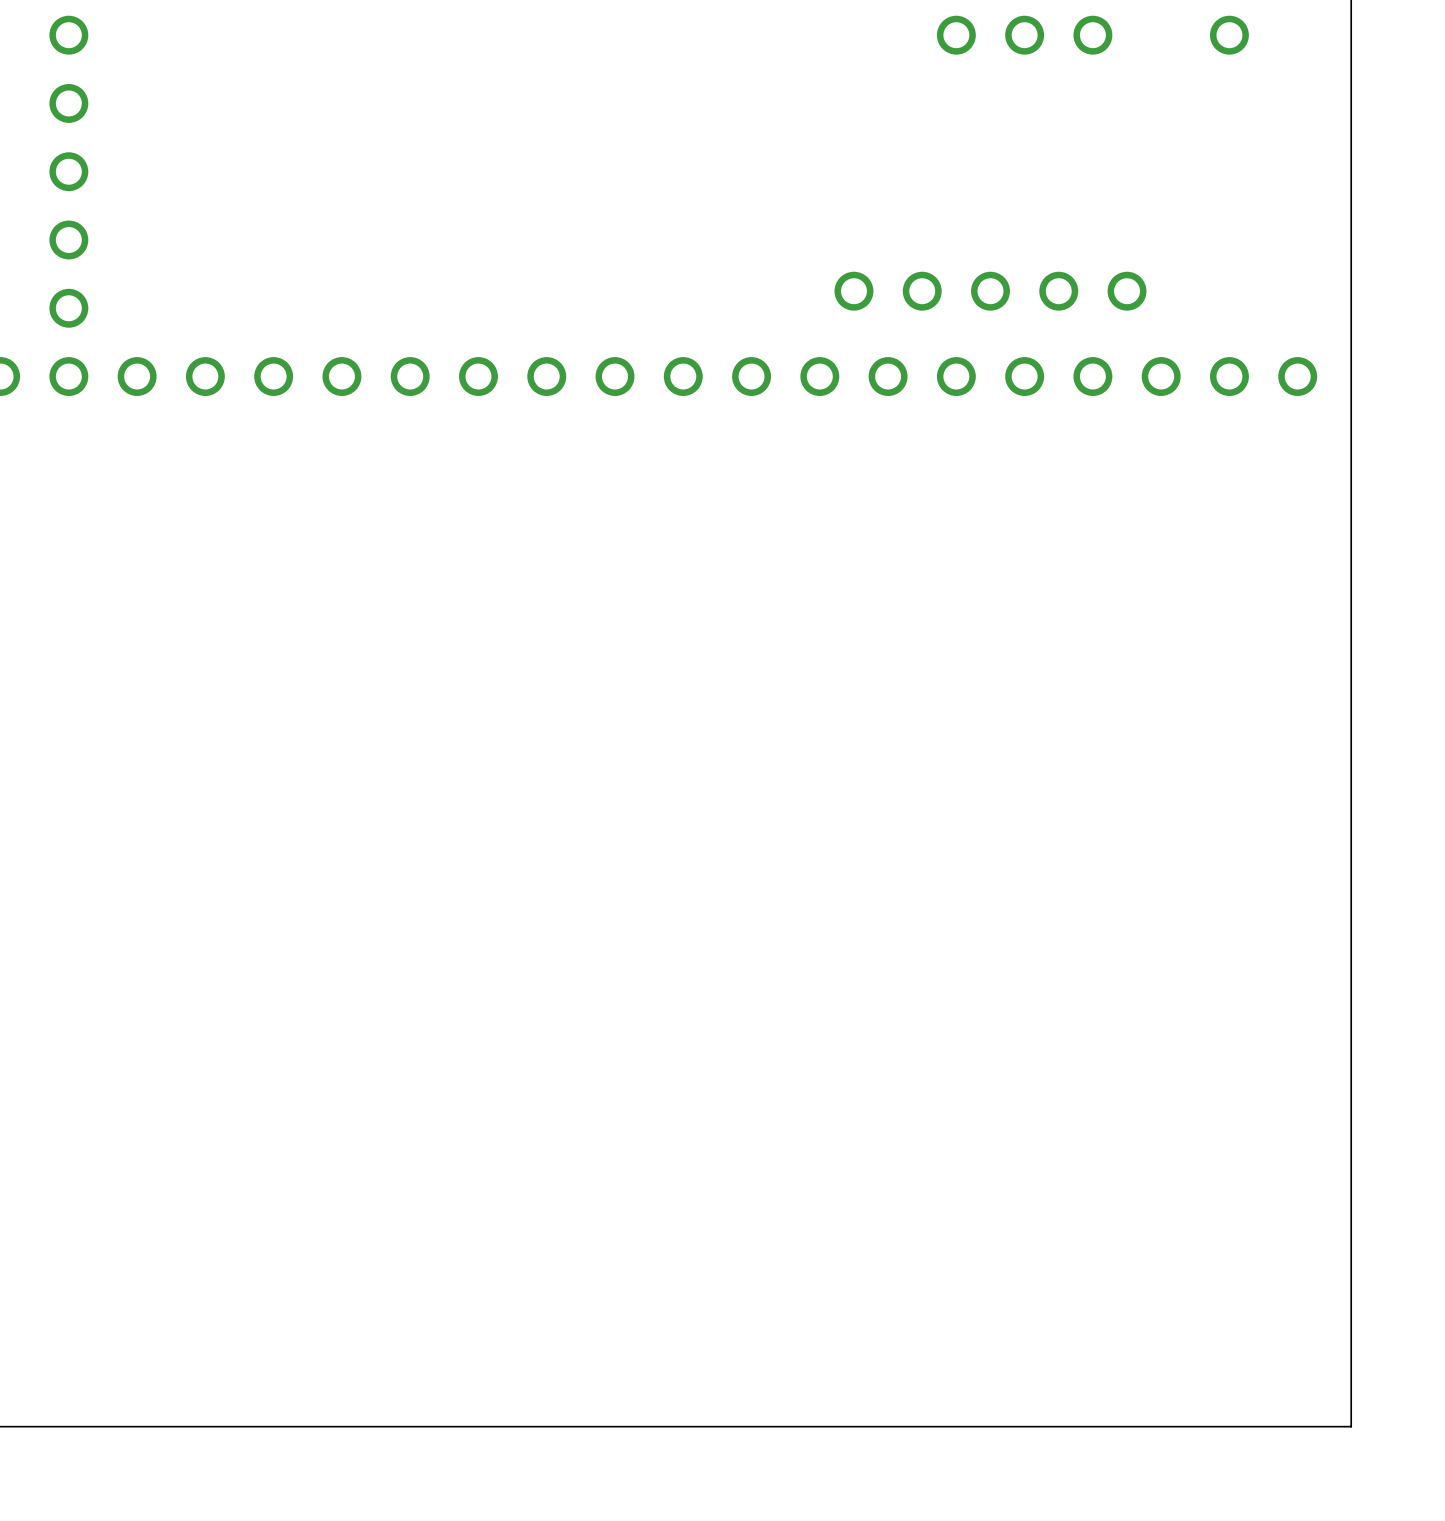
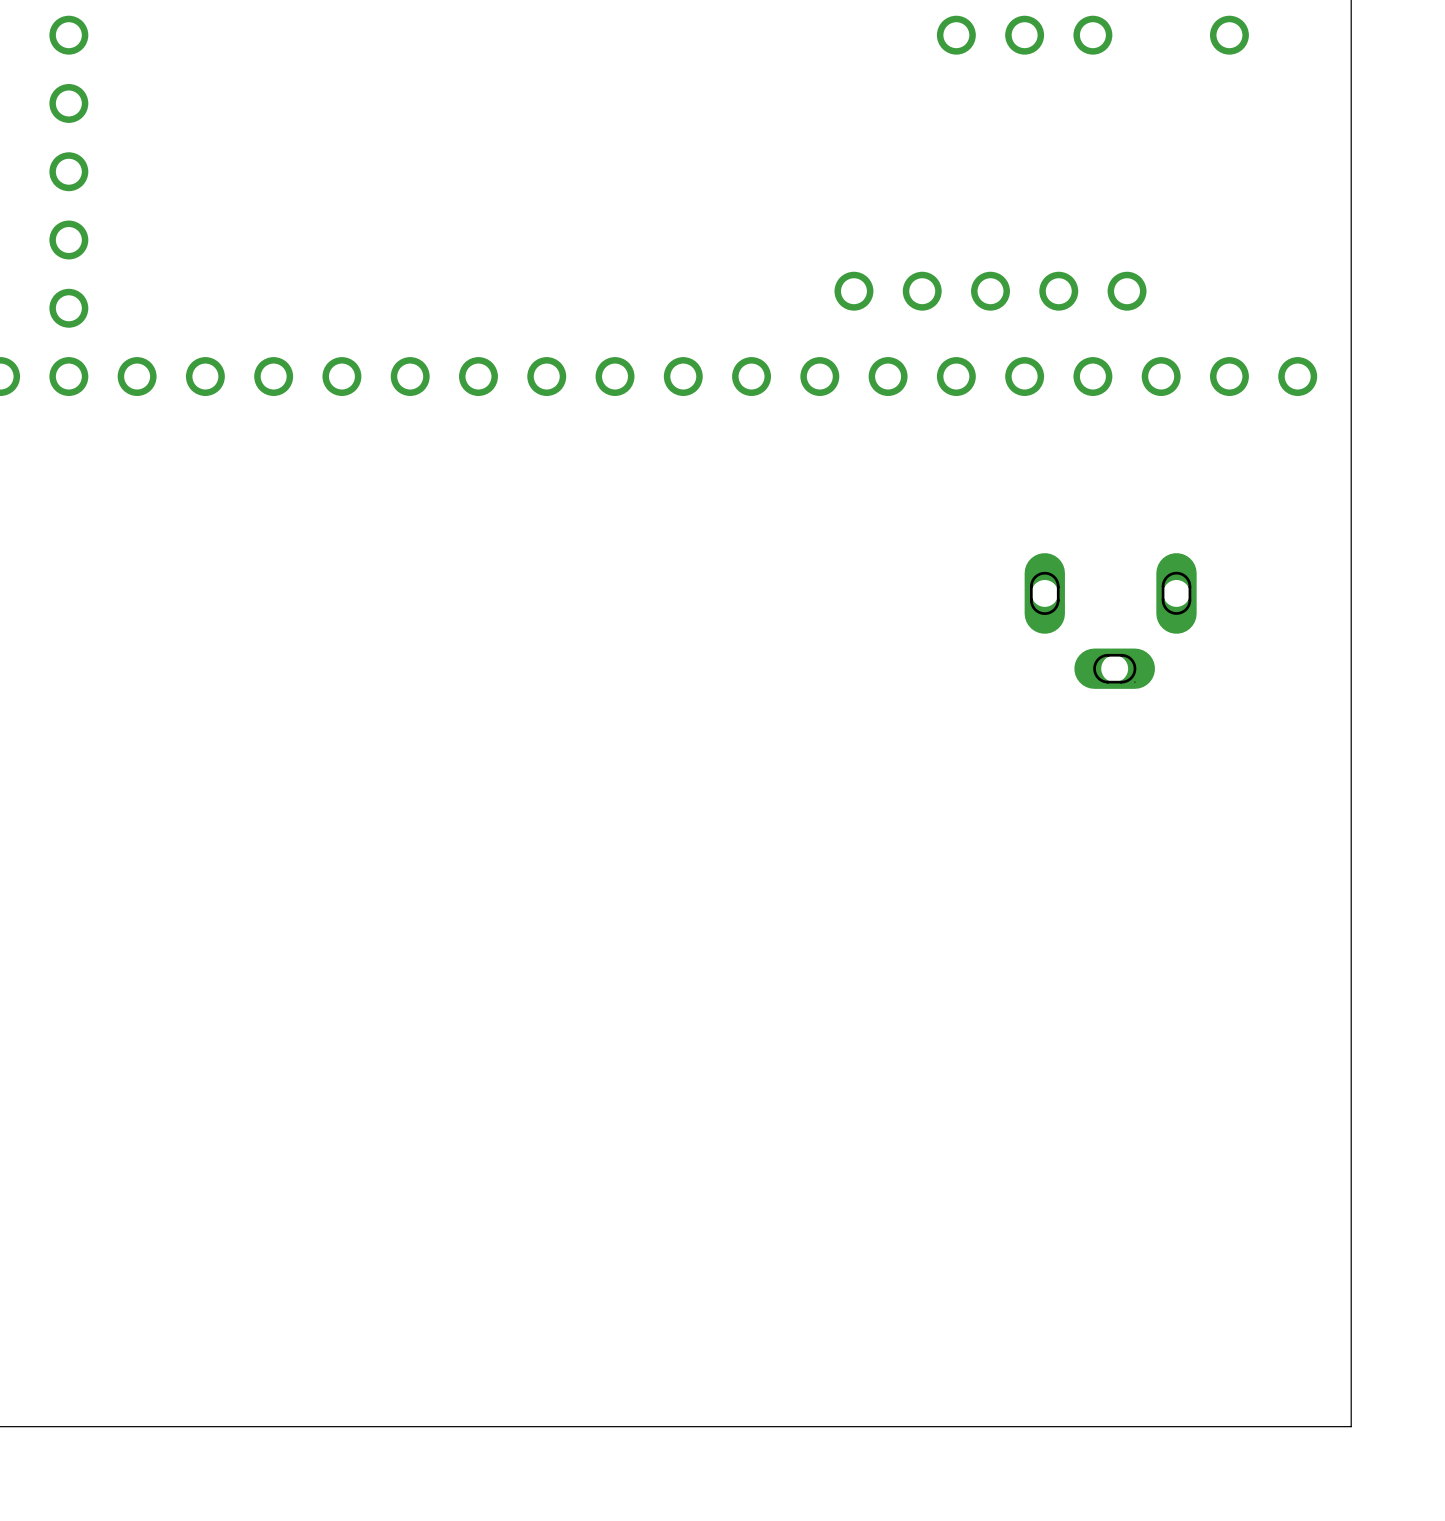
part: none -> (1110, 620)

